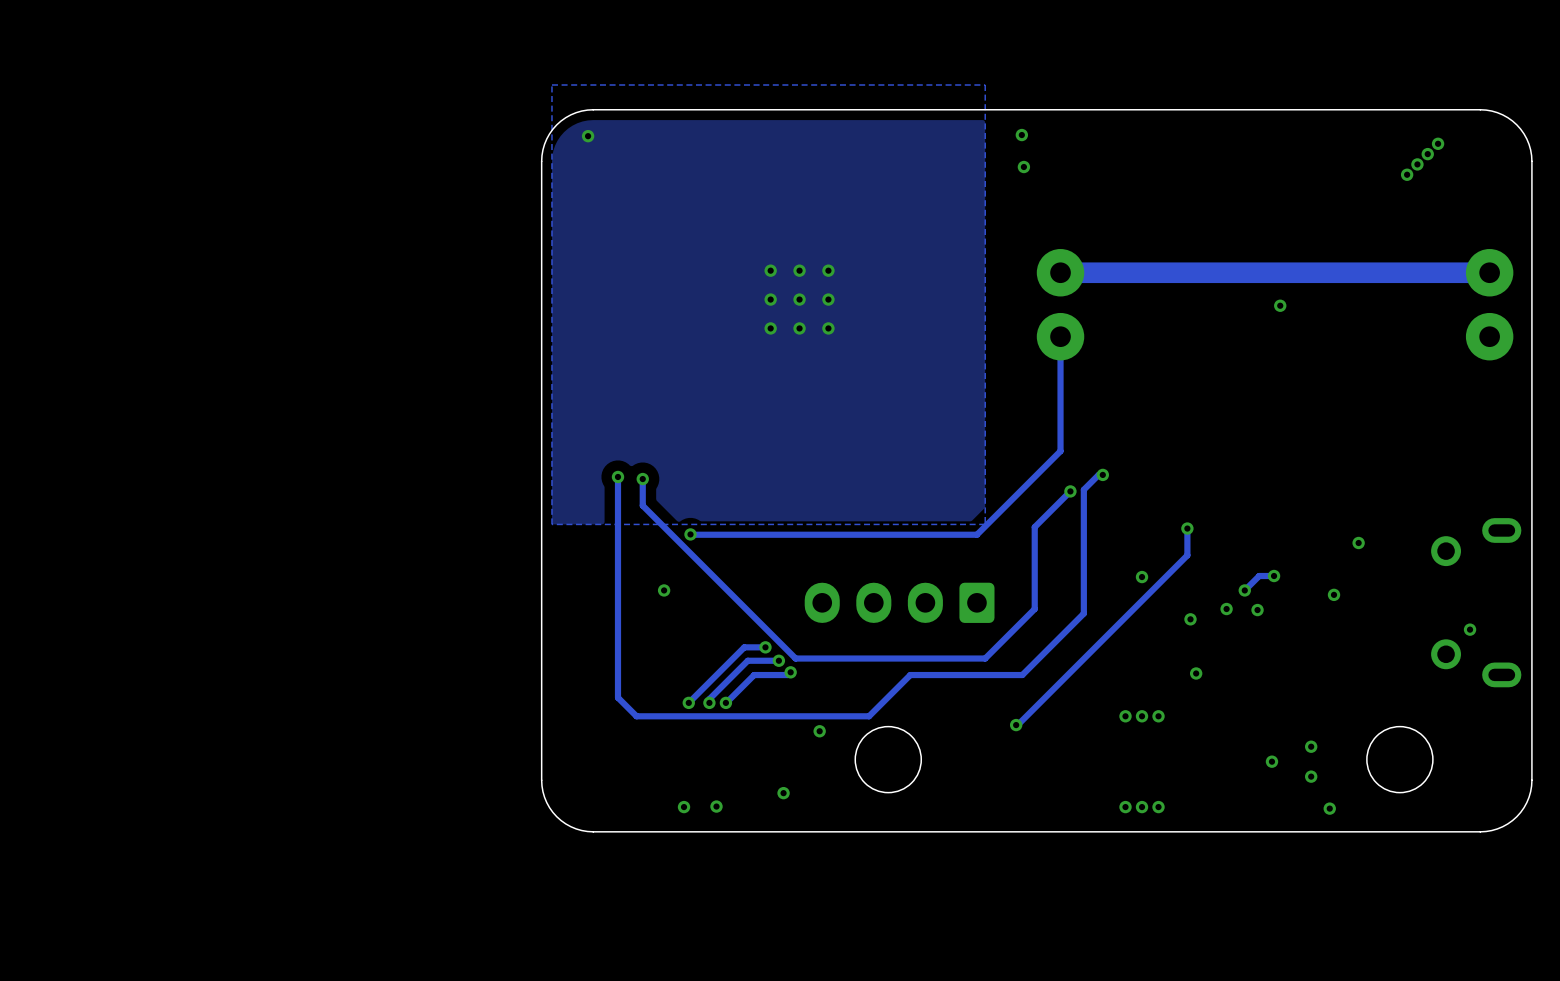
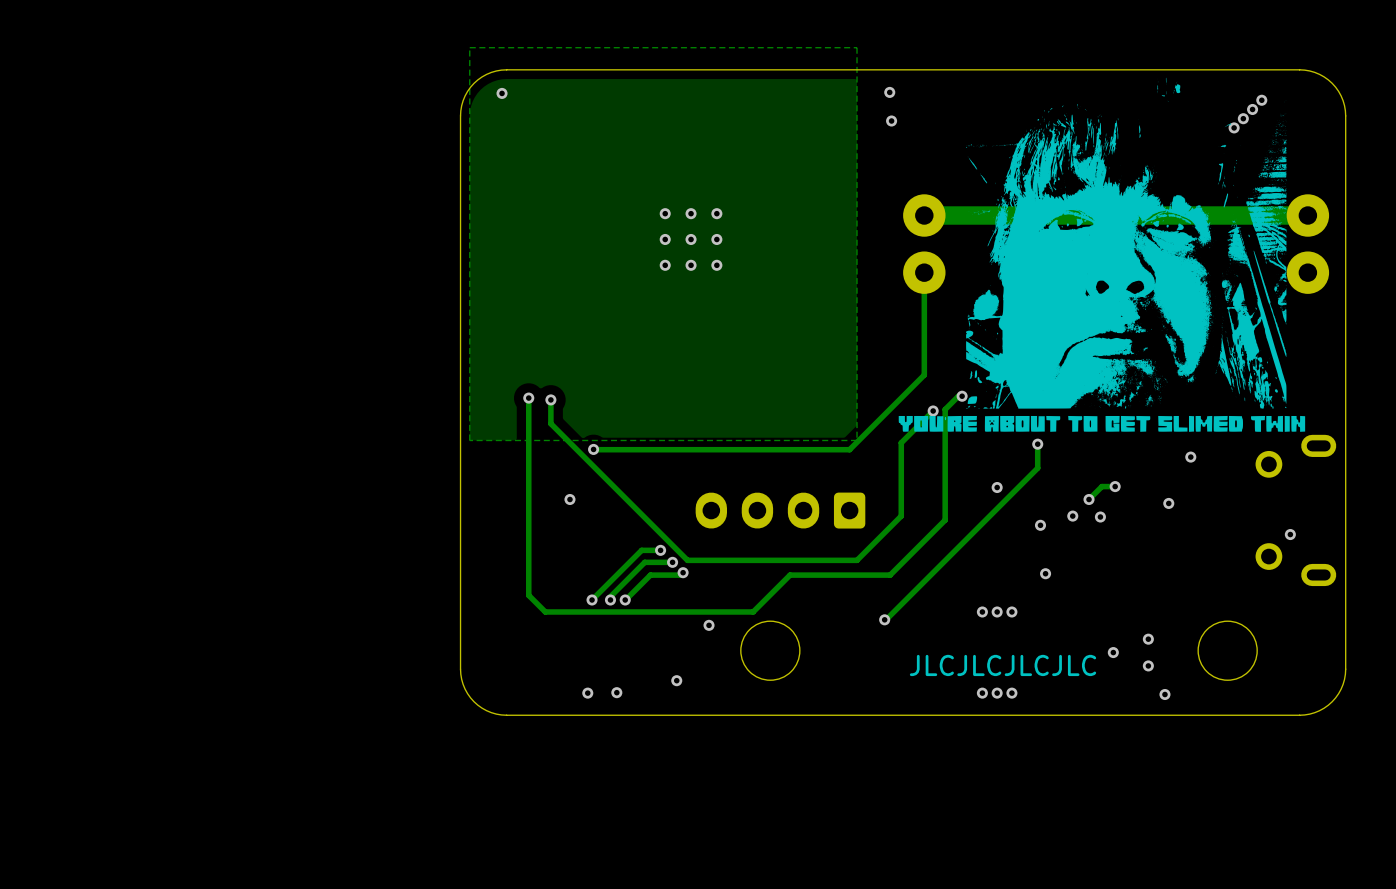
drawing: none -> [898, 77, 1306, 432]
text: none -> JLCJLCJLCJLC (1003, 665)

